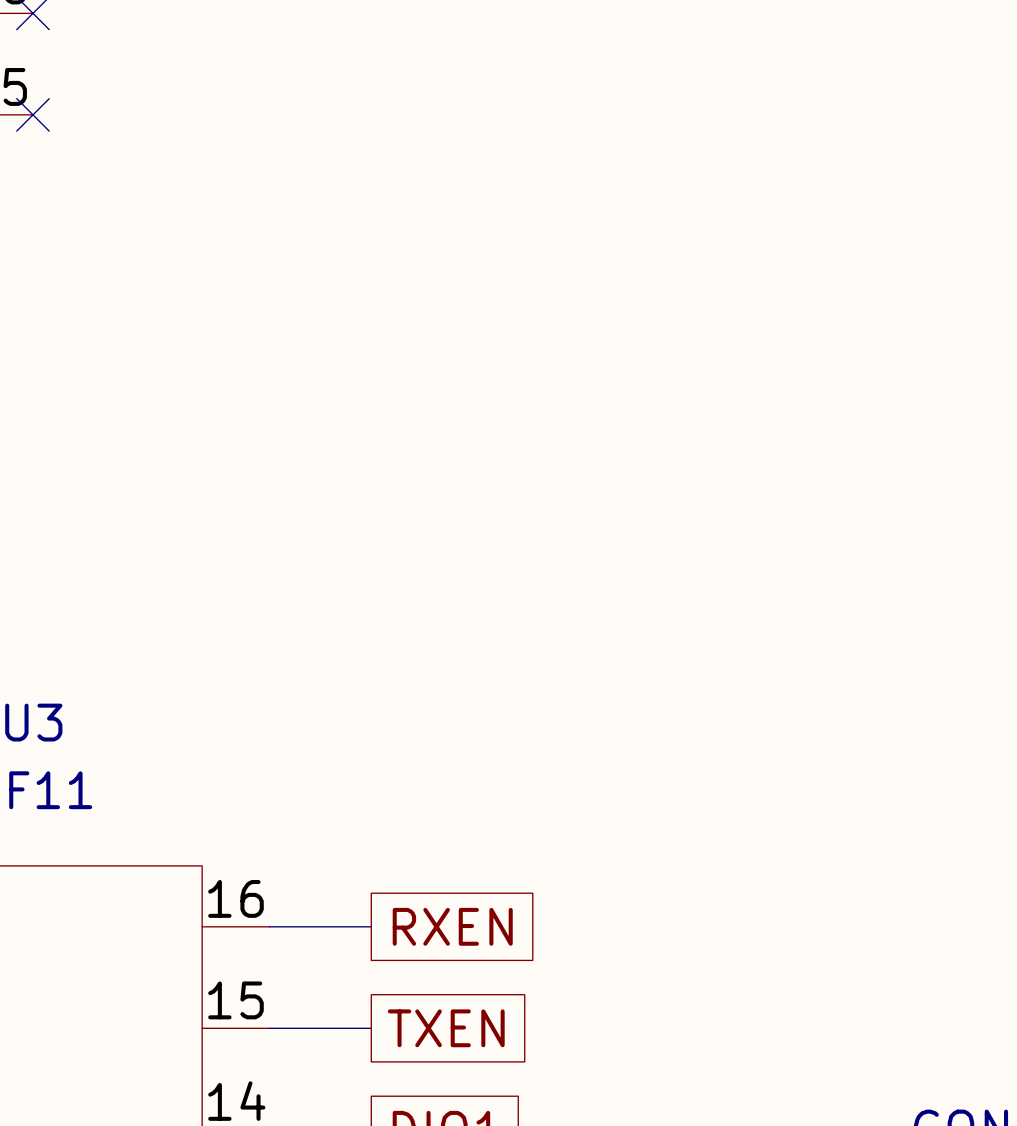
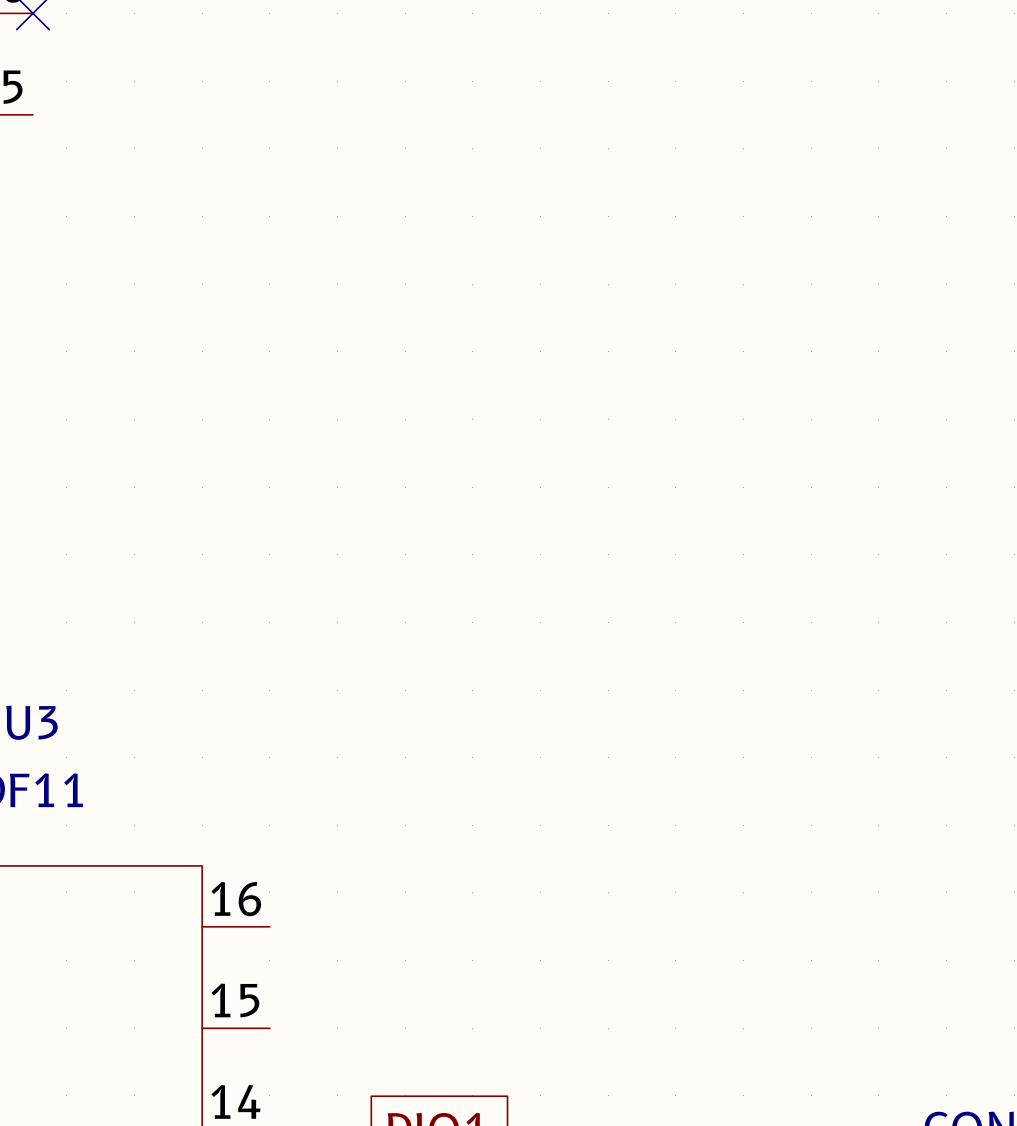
no-connect mark: (32, 114) -> none
wire: (269, 926) (371, 926) -> none
global label: RXEN (452, 926) -> none
wire: (269, 1028) (371, 1028) -> none
global label: TXEN (446, 1028) -> none

